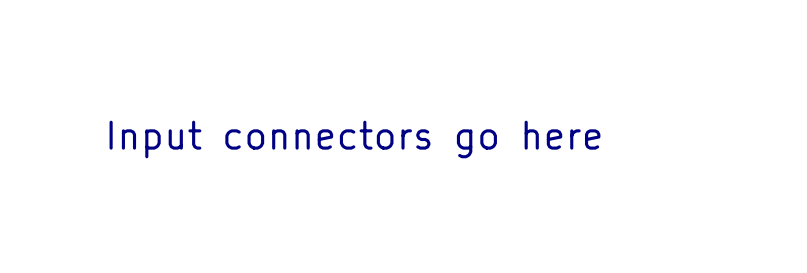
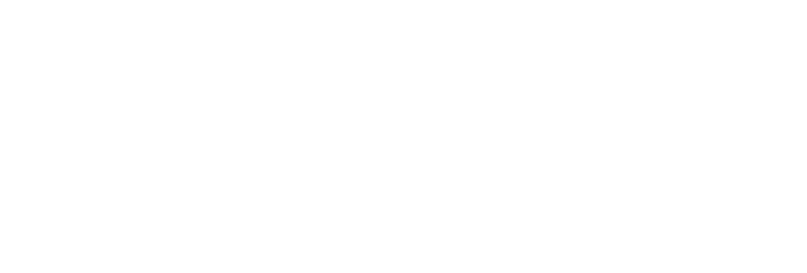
text: Input connectors go here (354, 139) -> none

